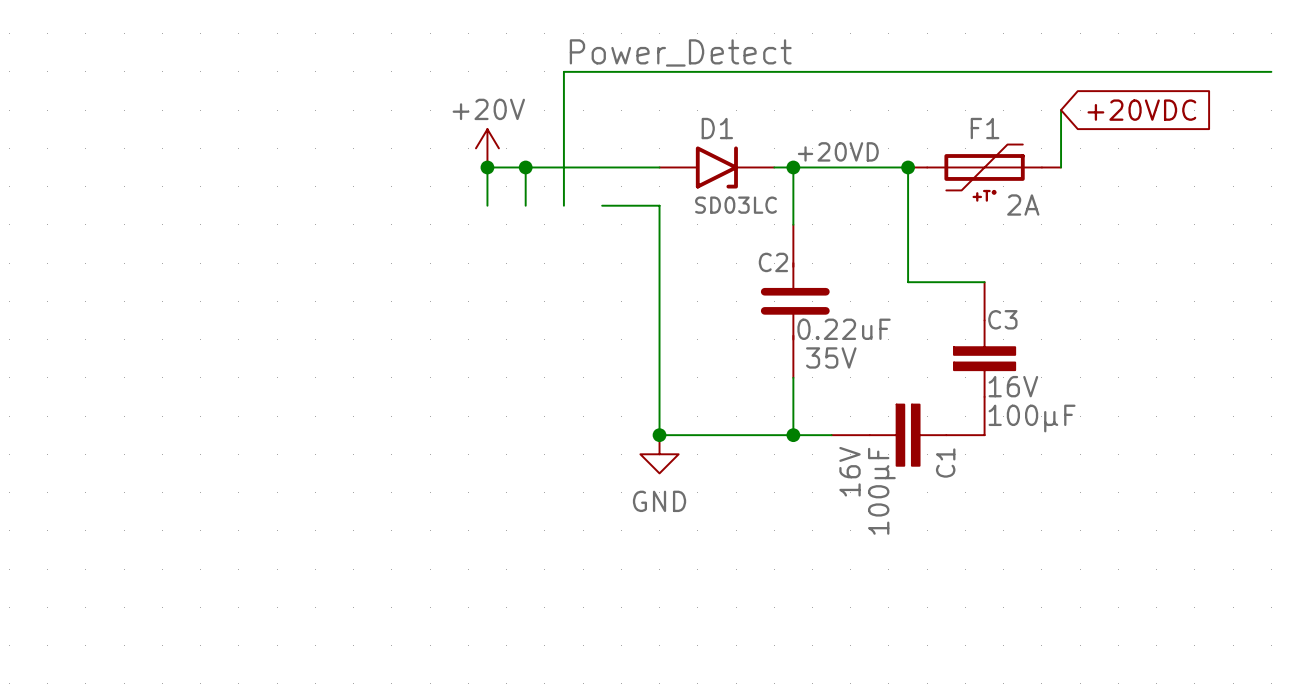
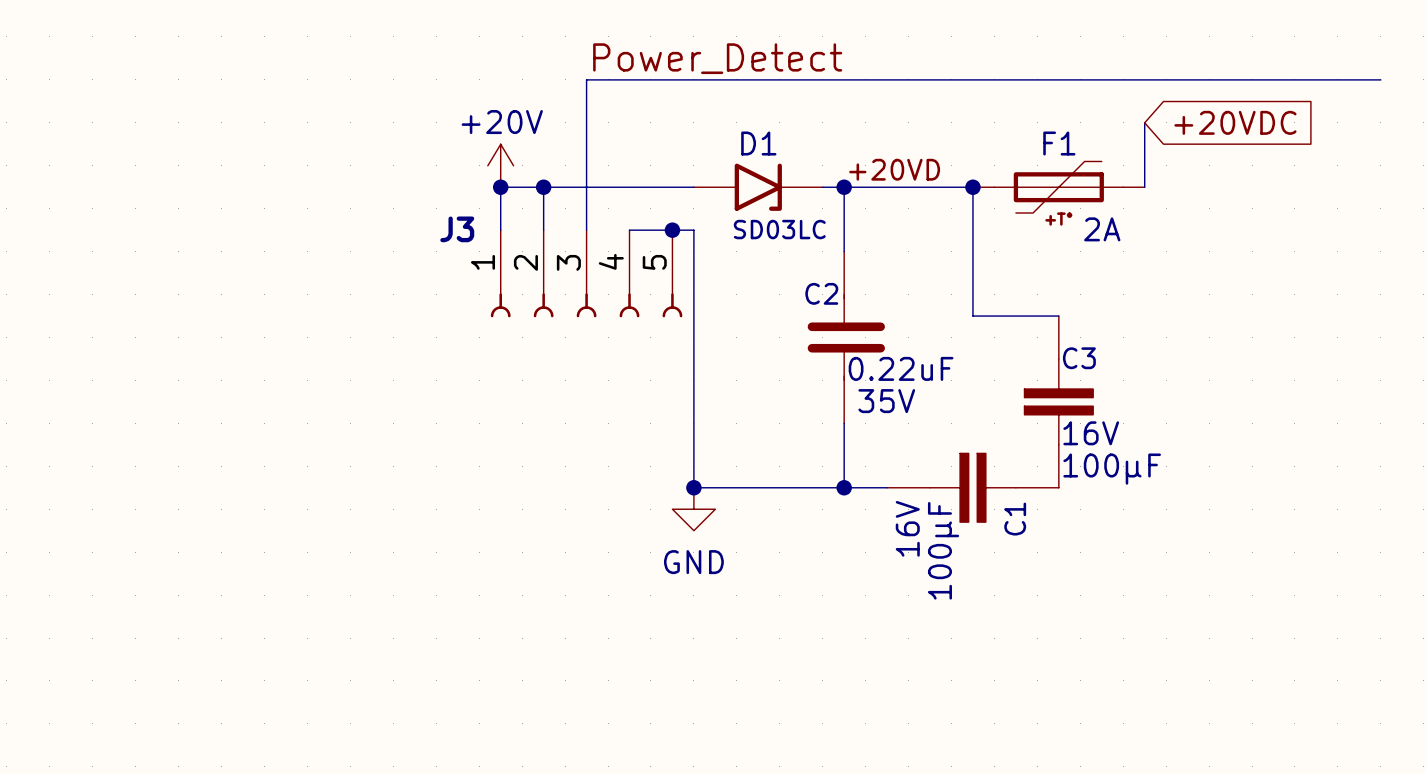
junction: none -> (672, 230)
J3: none -> (586, 273)

